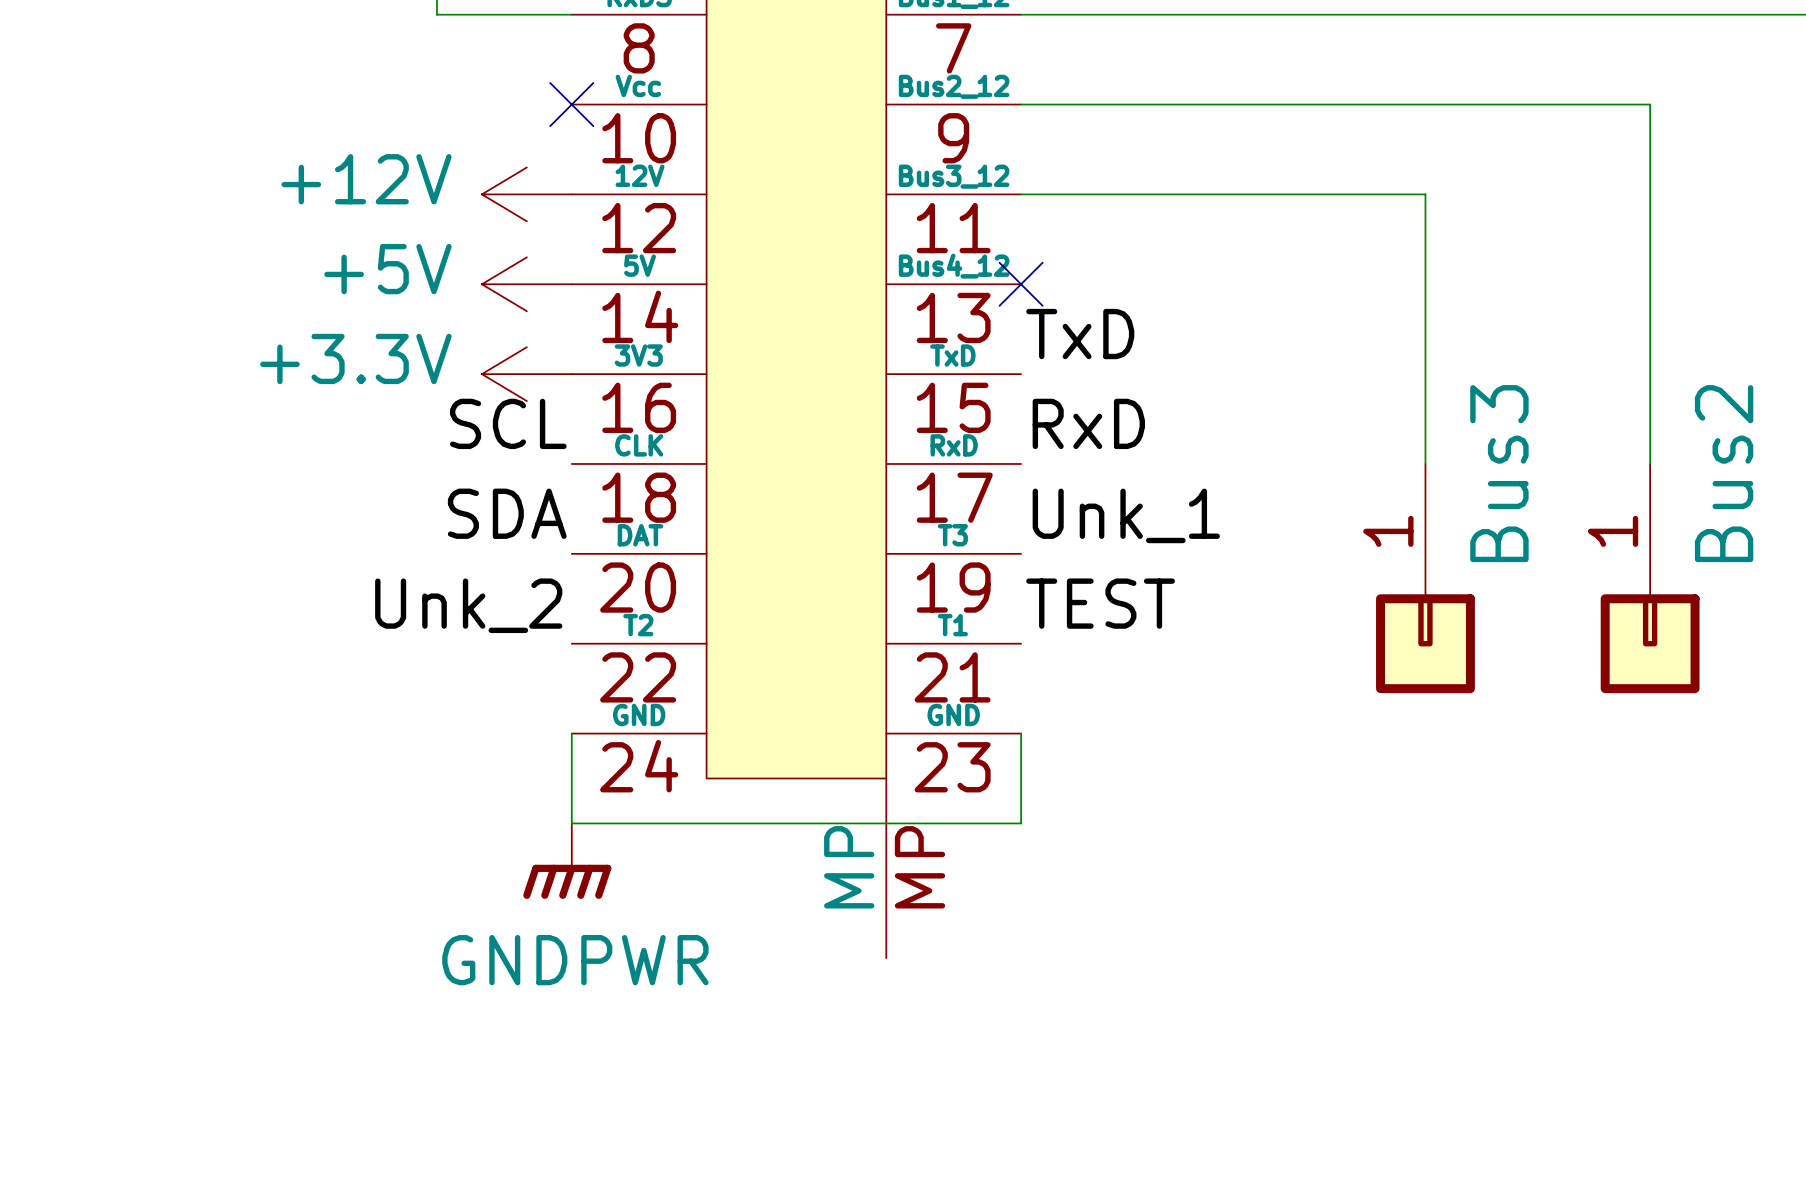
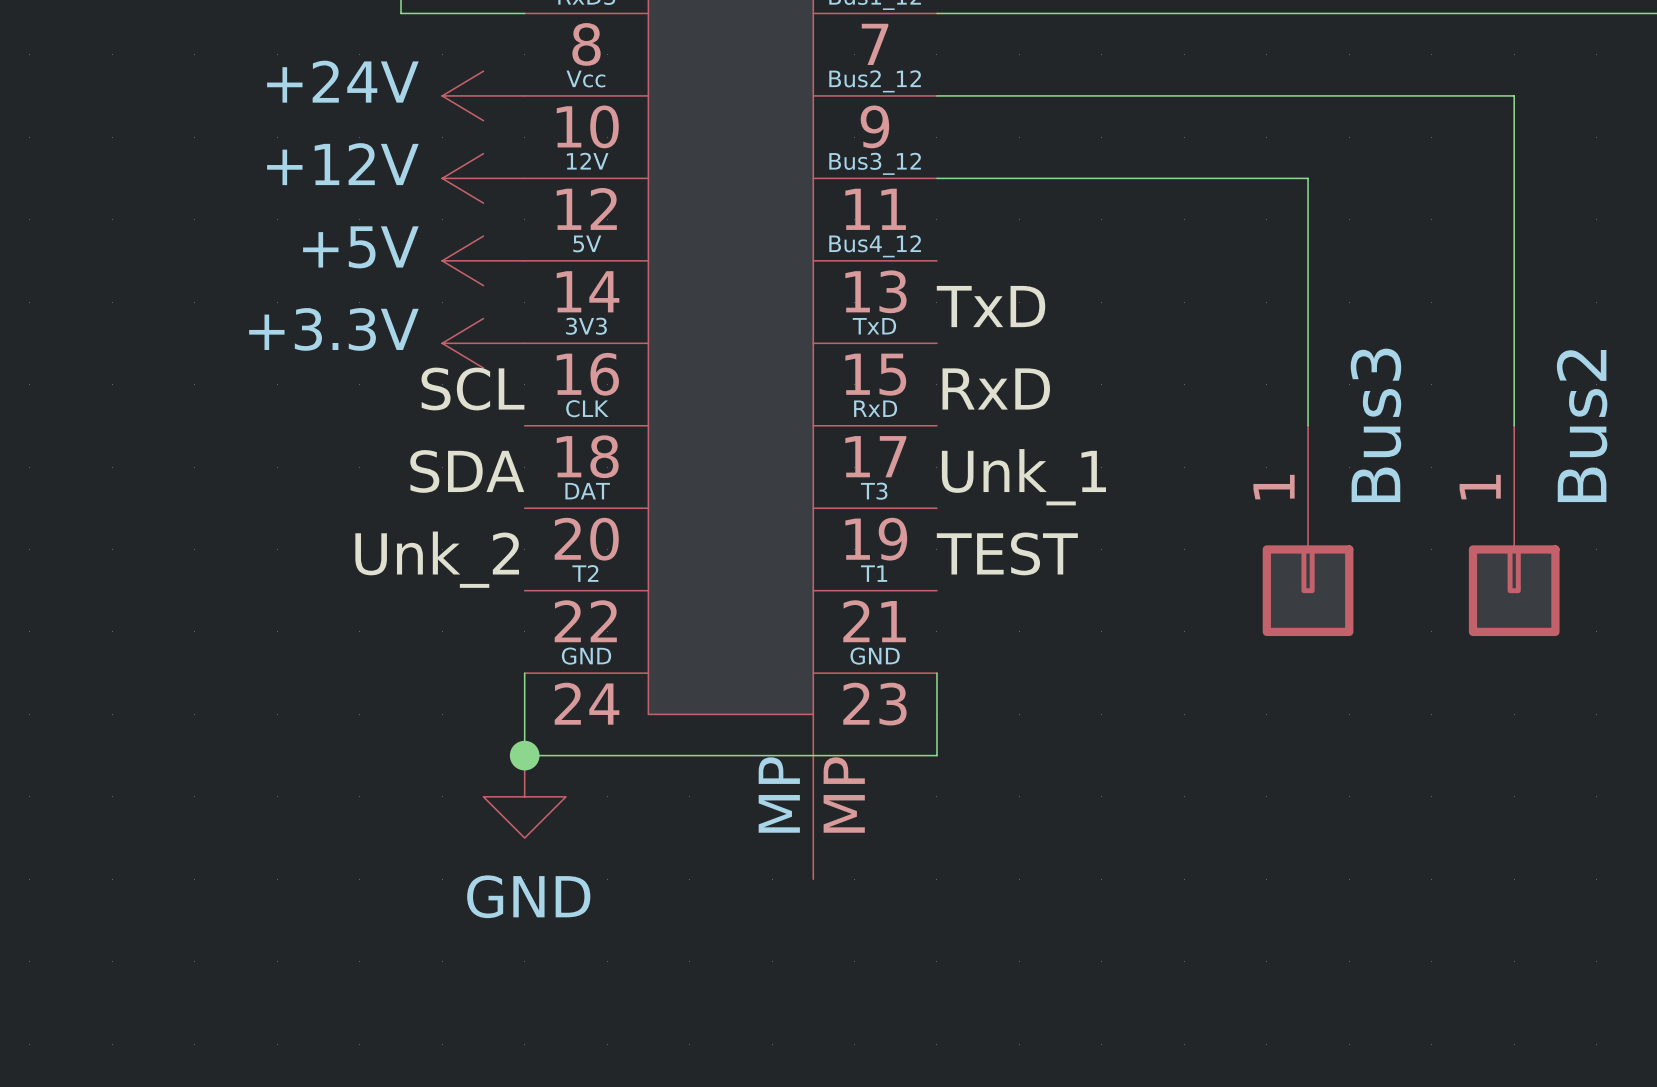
power symbol: none -> +24V (483, 95)
no-connect mark: (571, 104) -> none
no-connect mark: (1021, 284) -> none
junction: none -> (524, 755)
power symbol: GNDPWR (567, 861) -> GND (524, 796)

